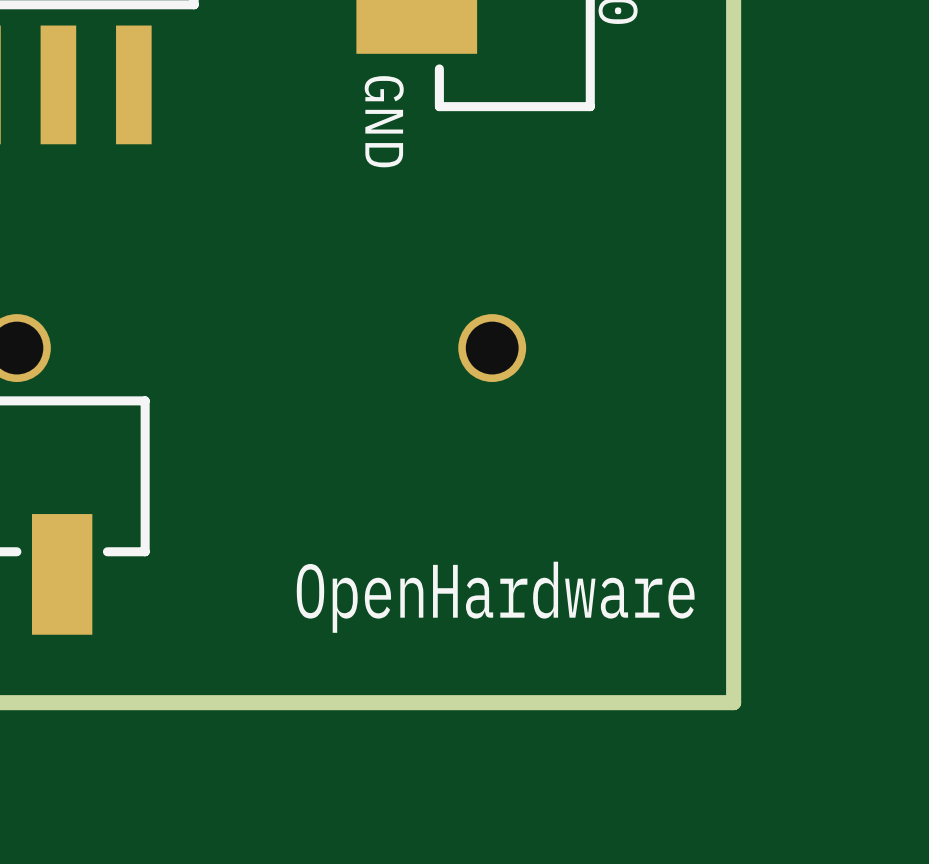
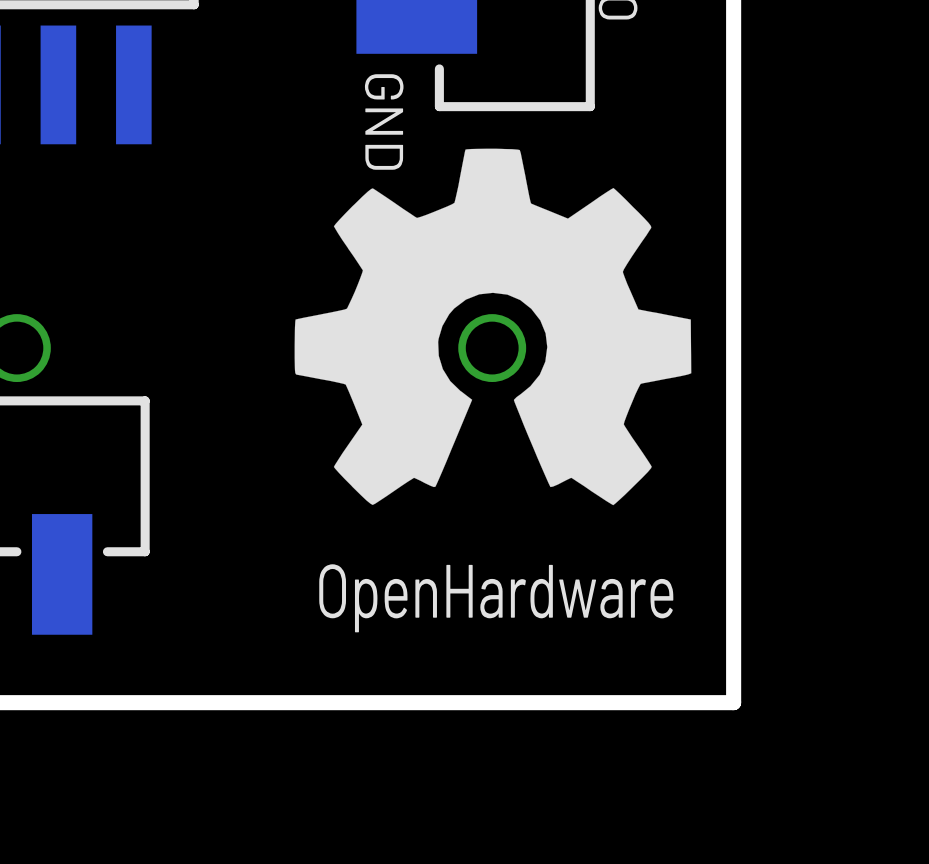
drawing: none -> [294, 148, 692, 506]

